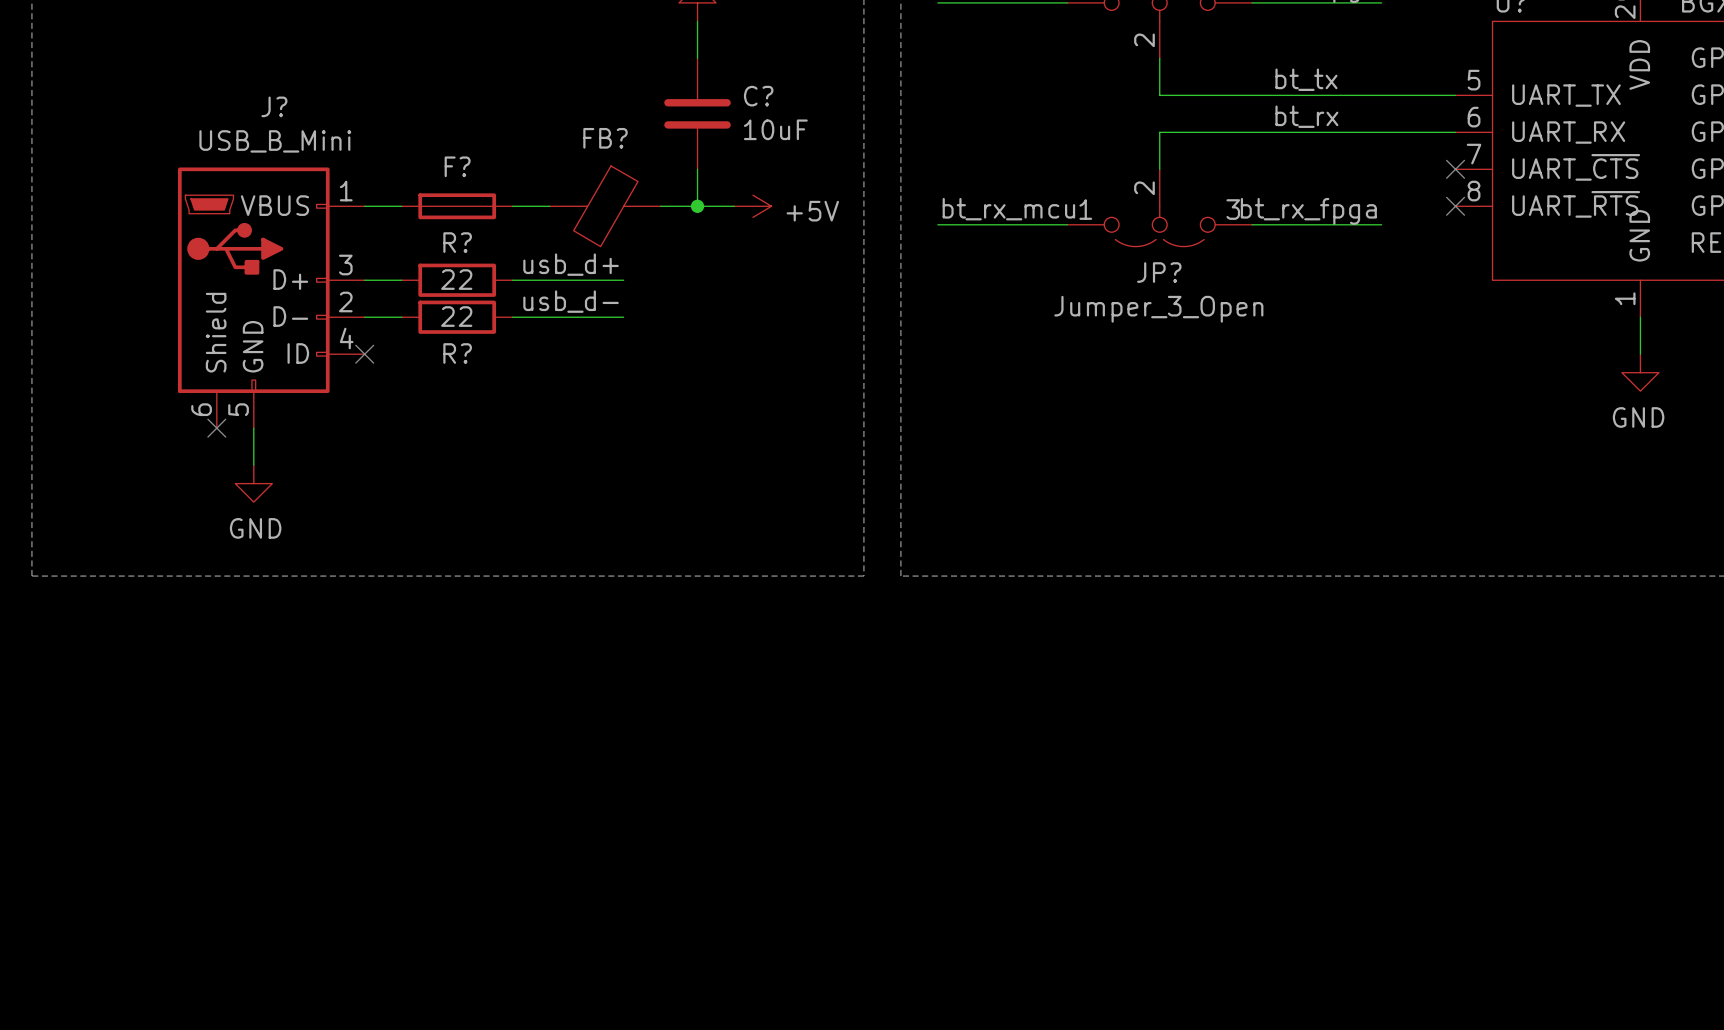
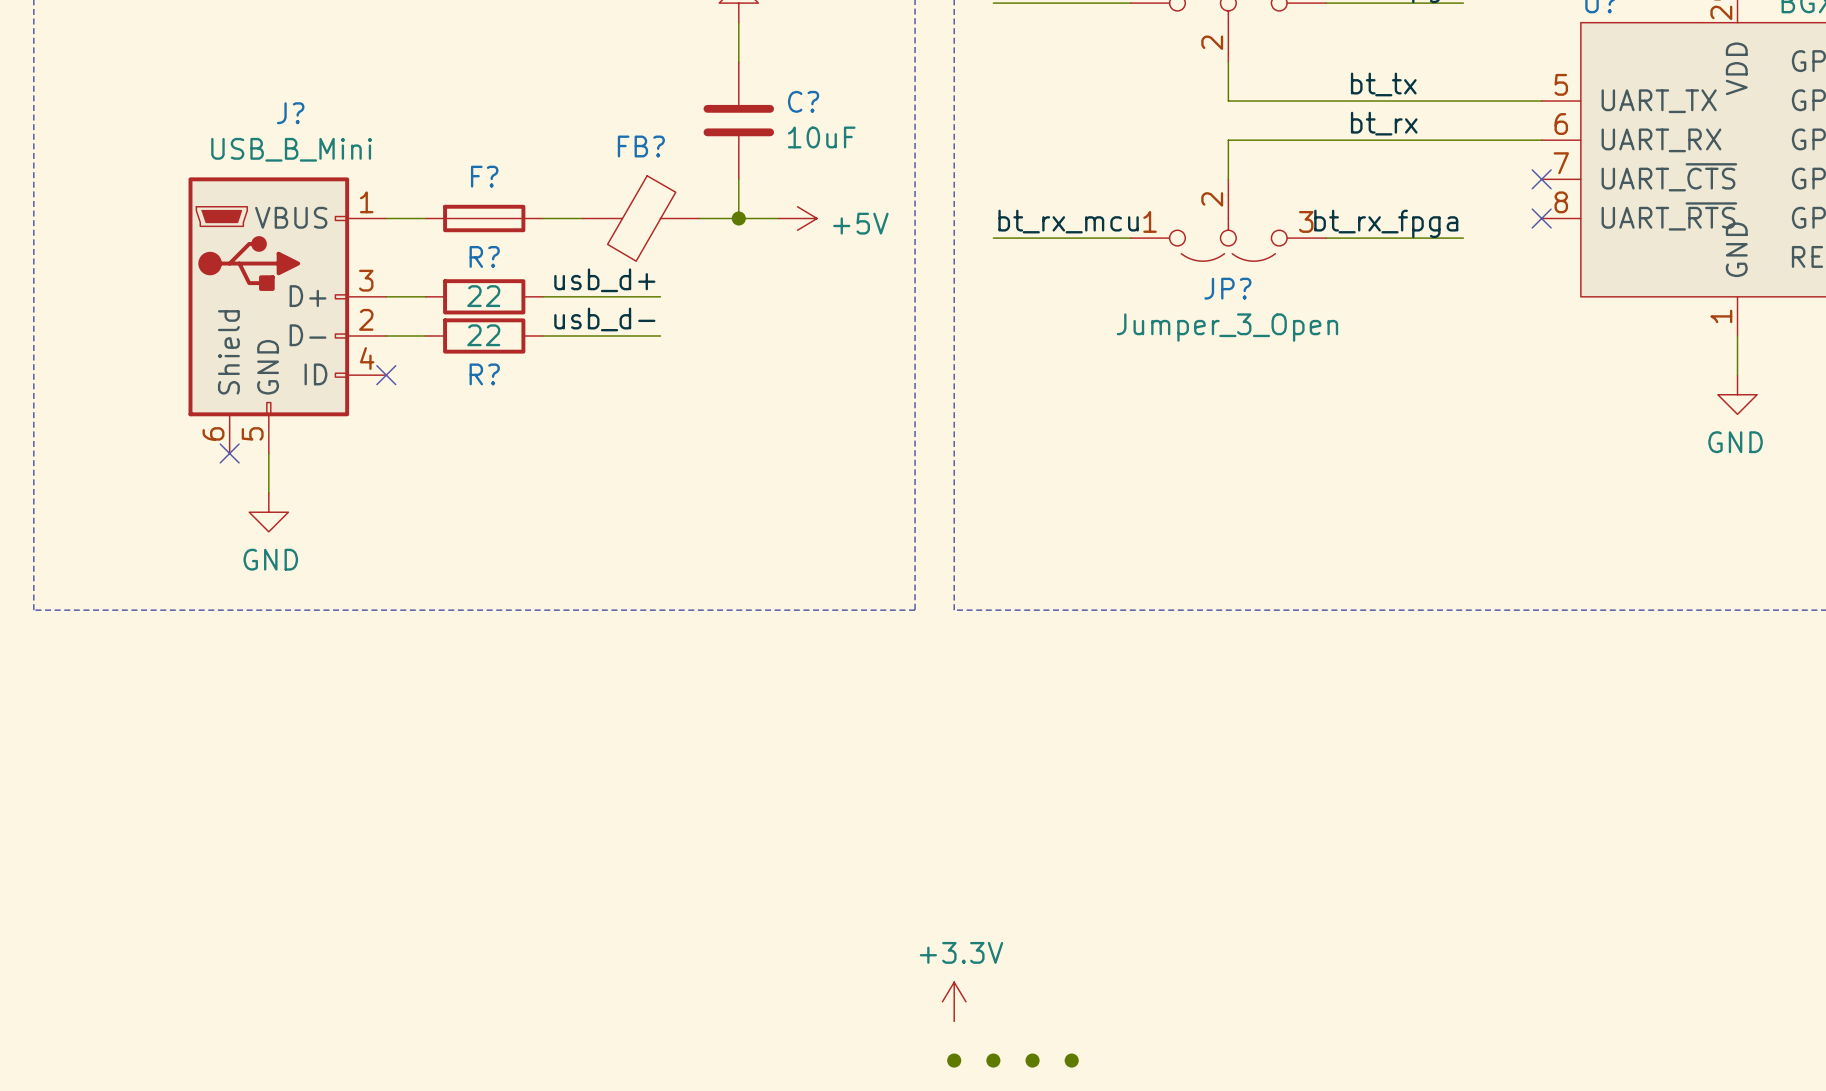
power symbol: none -> +3.3V (954, 1001)
junction: none -> (954, 1060)
junction: none -> (993, 1060)
junction: none -> (1032, 1060)
junction: none -> (1071, 1060)

